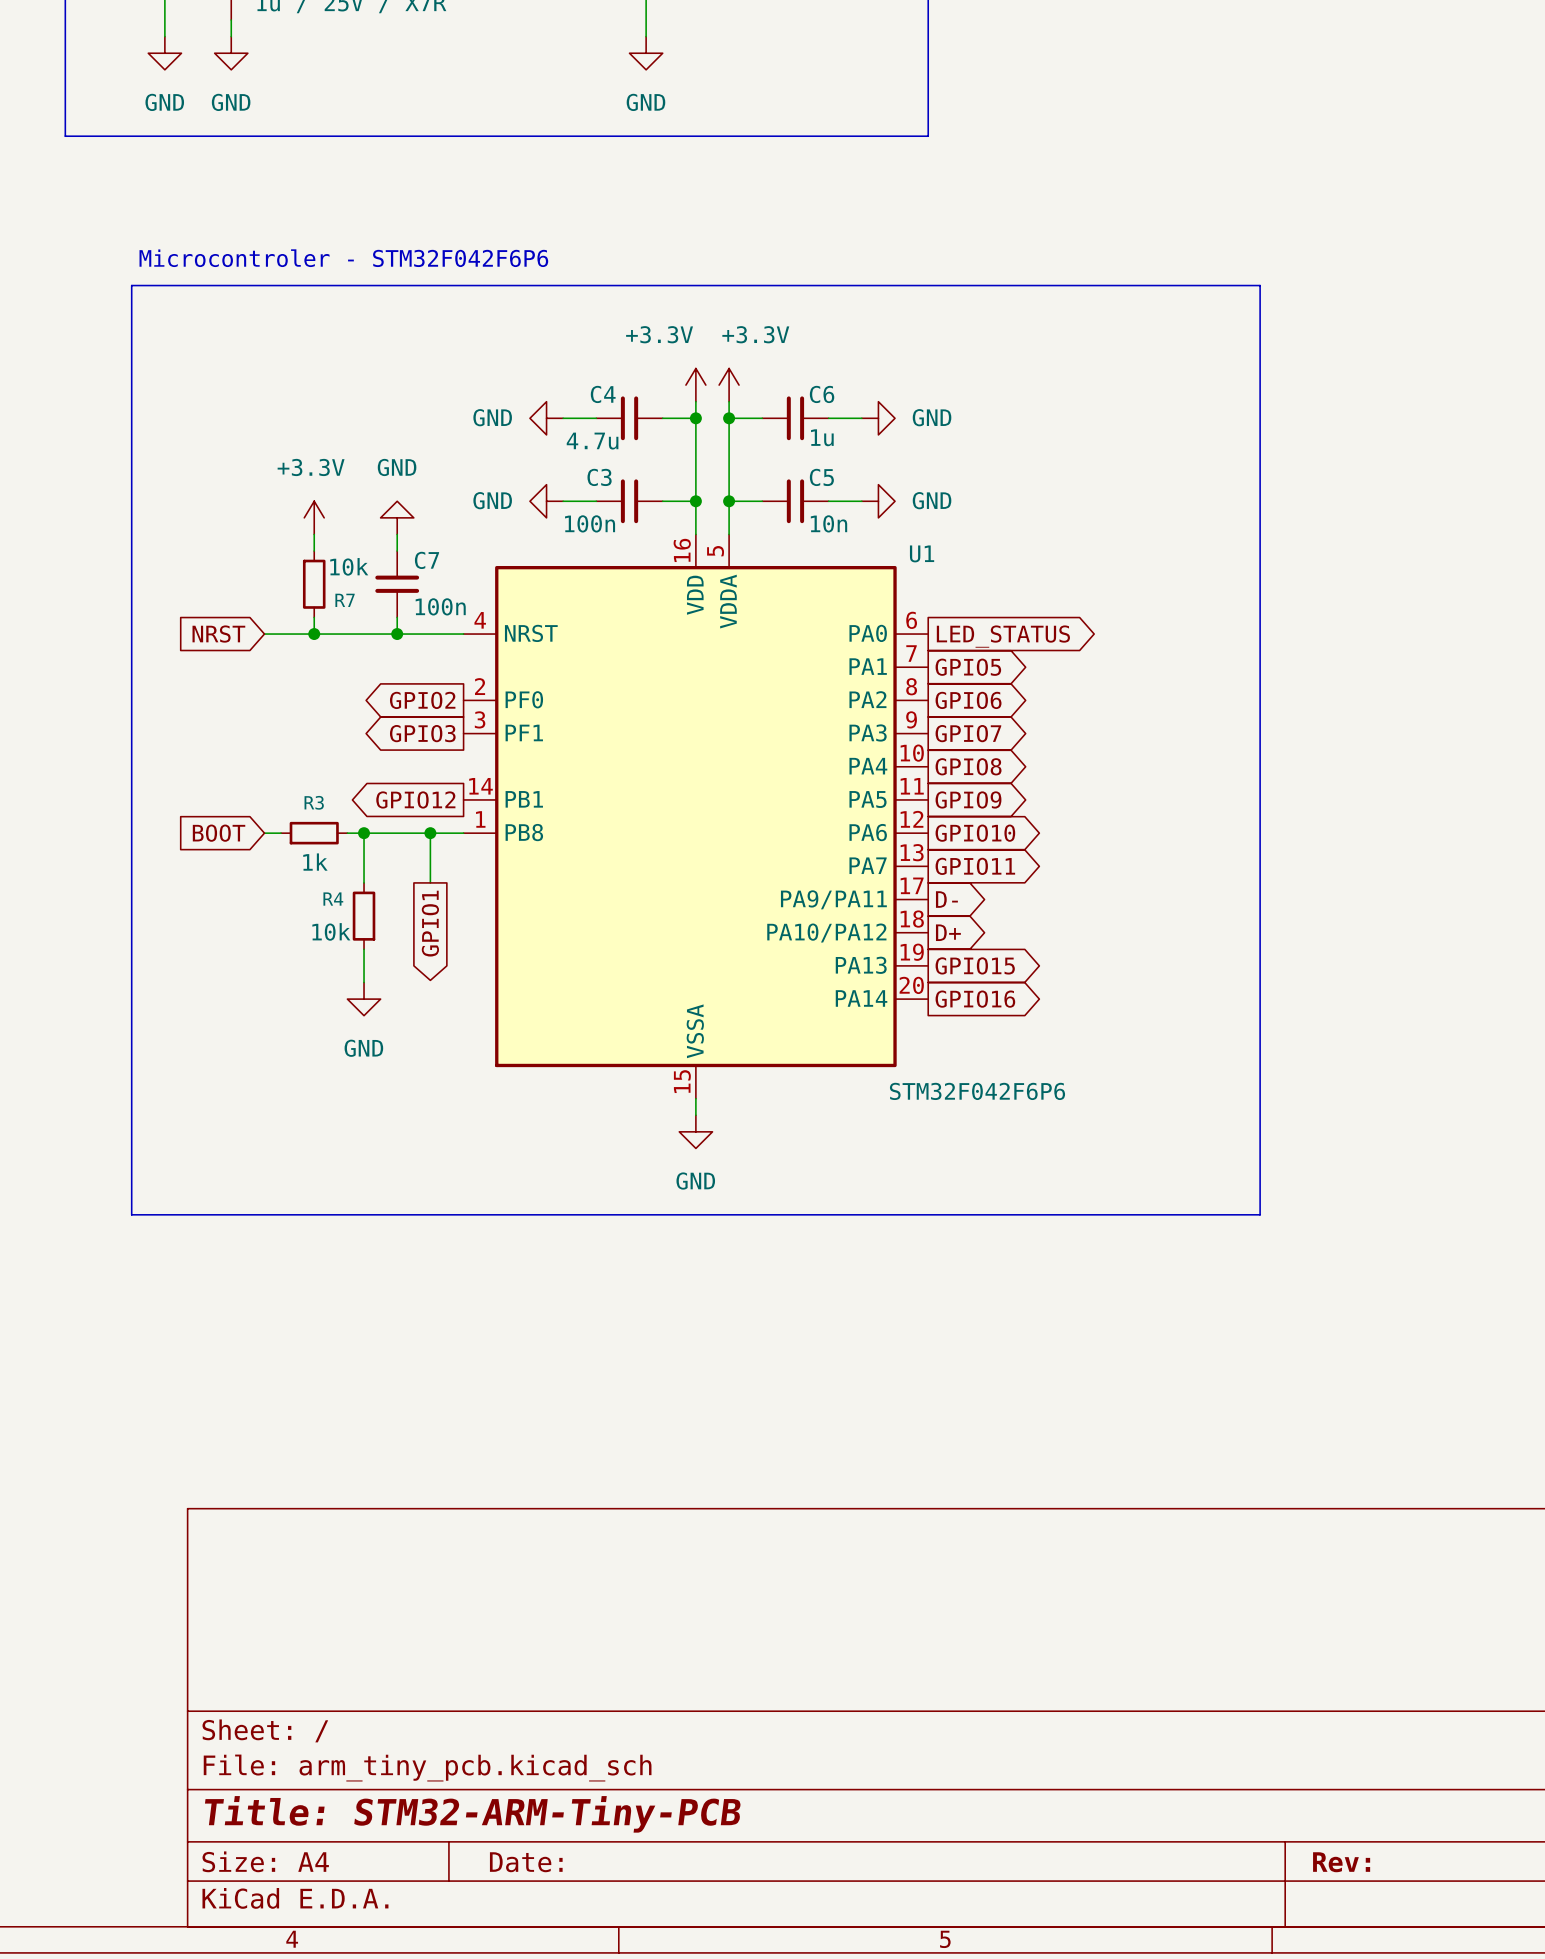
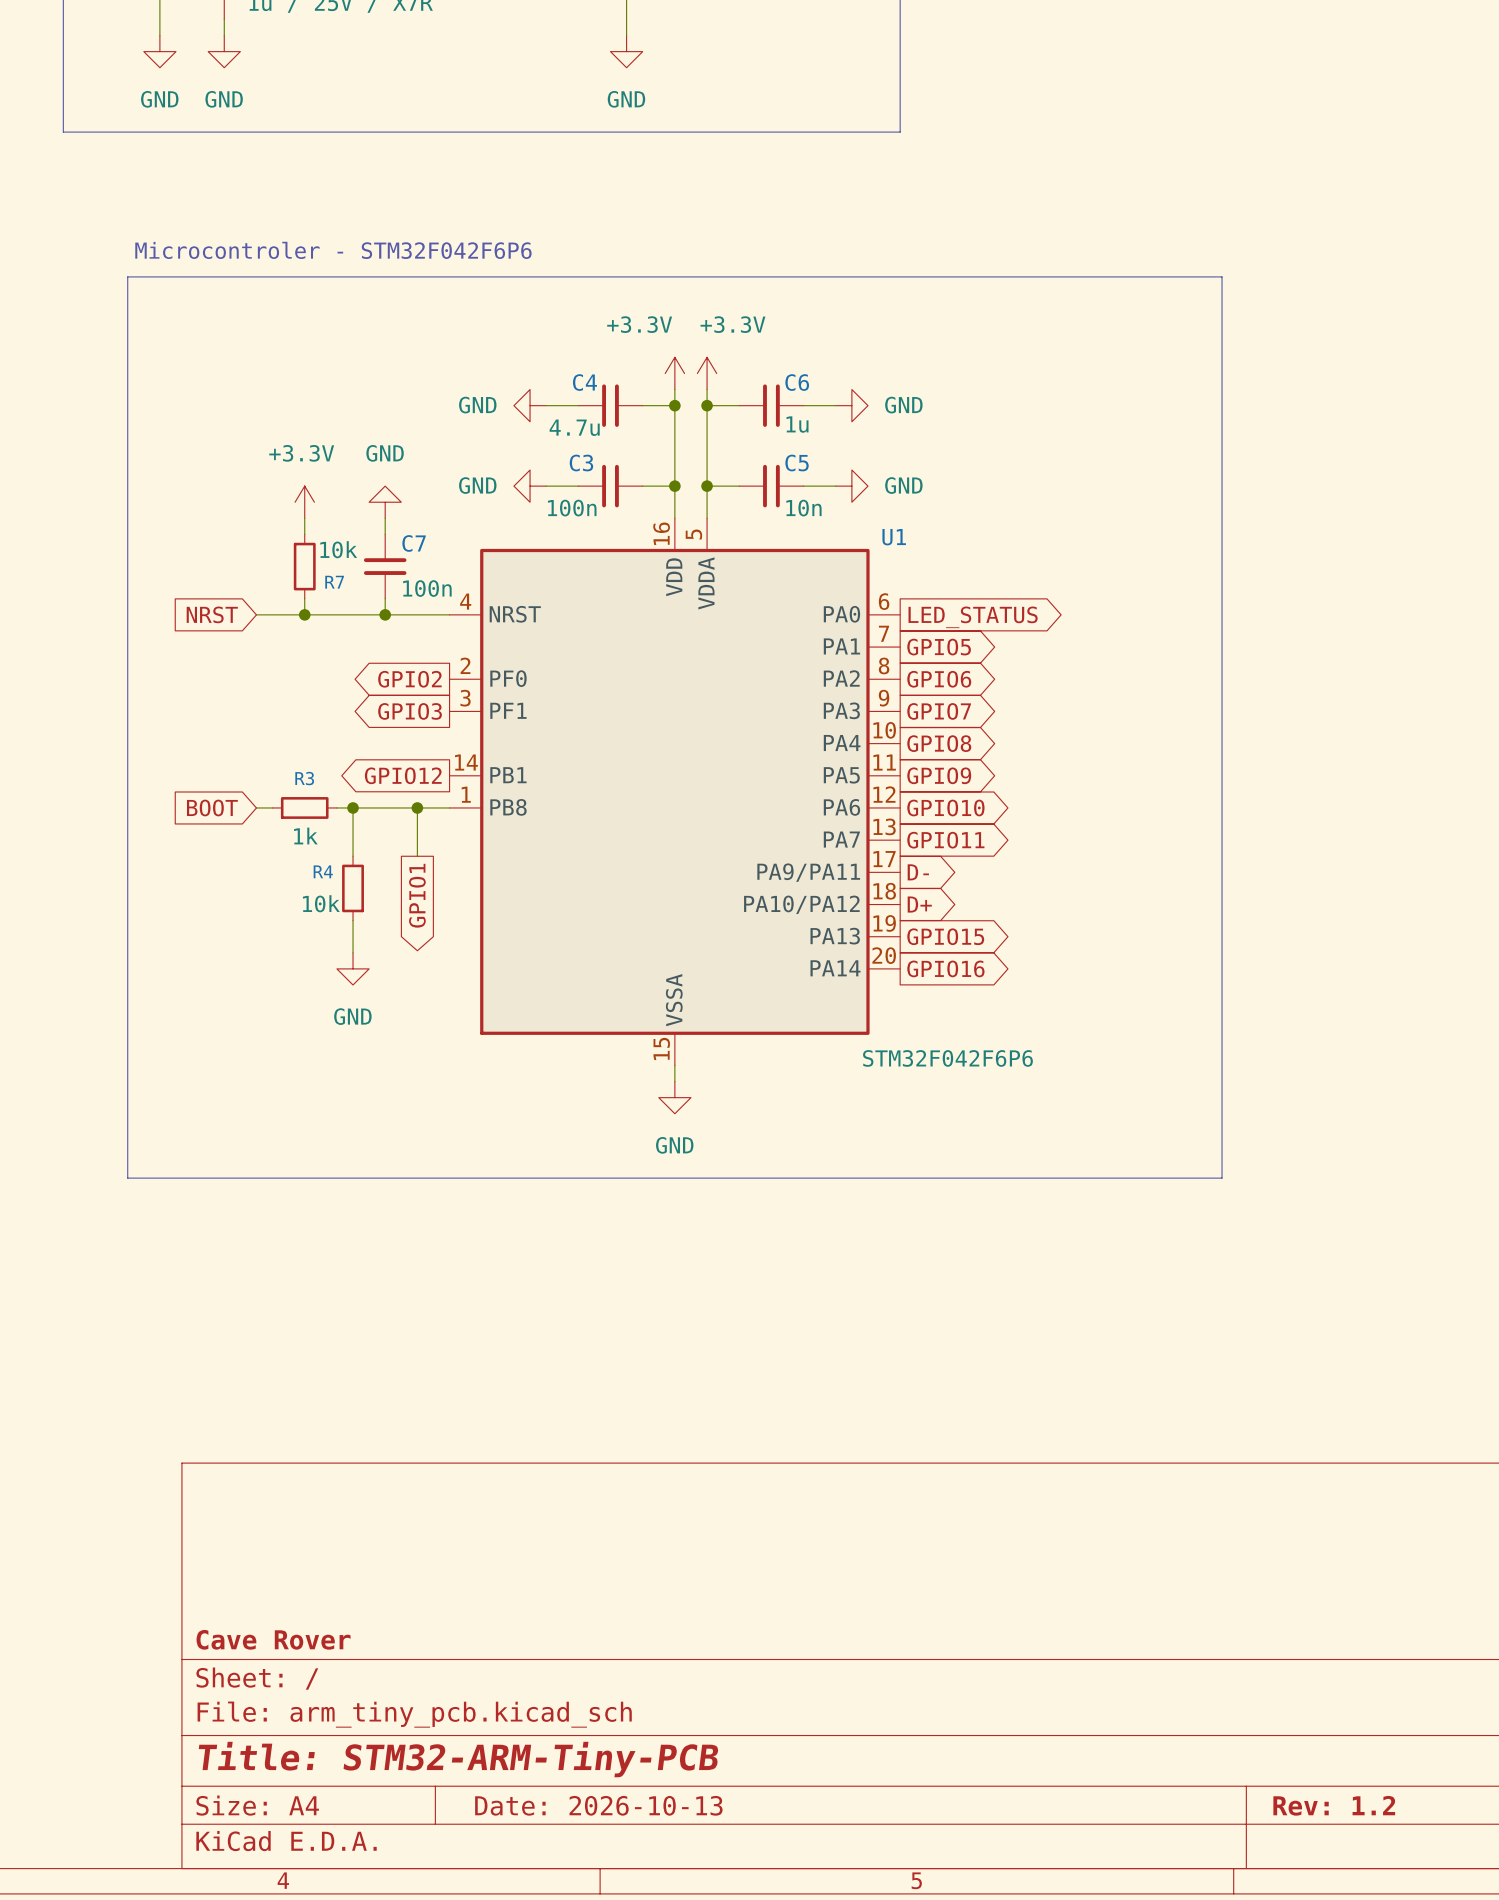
title block: none -> Cave Rover (273, 1639)
title block: Date: (526, 1862) -> Date: 2026-10-13 (598, 1805)
title block: Rev: (1341, 1862) -> Rev: 1.2 (1334, 1805)

